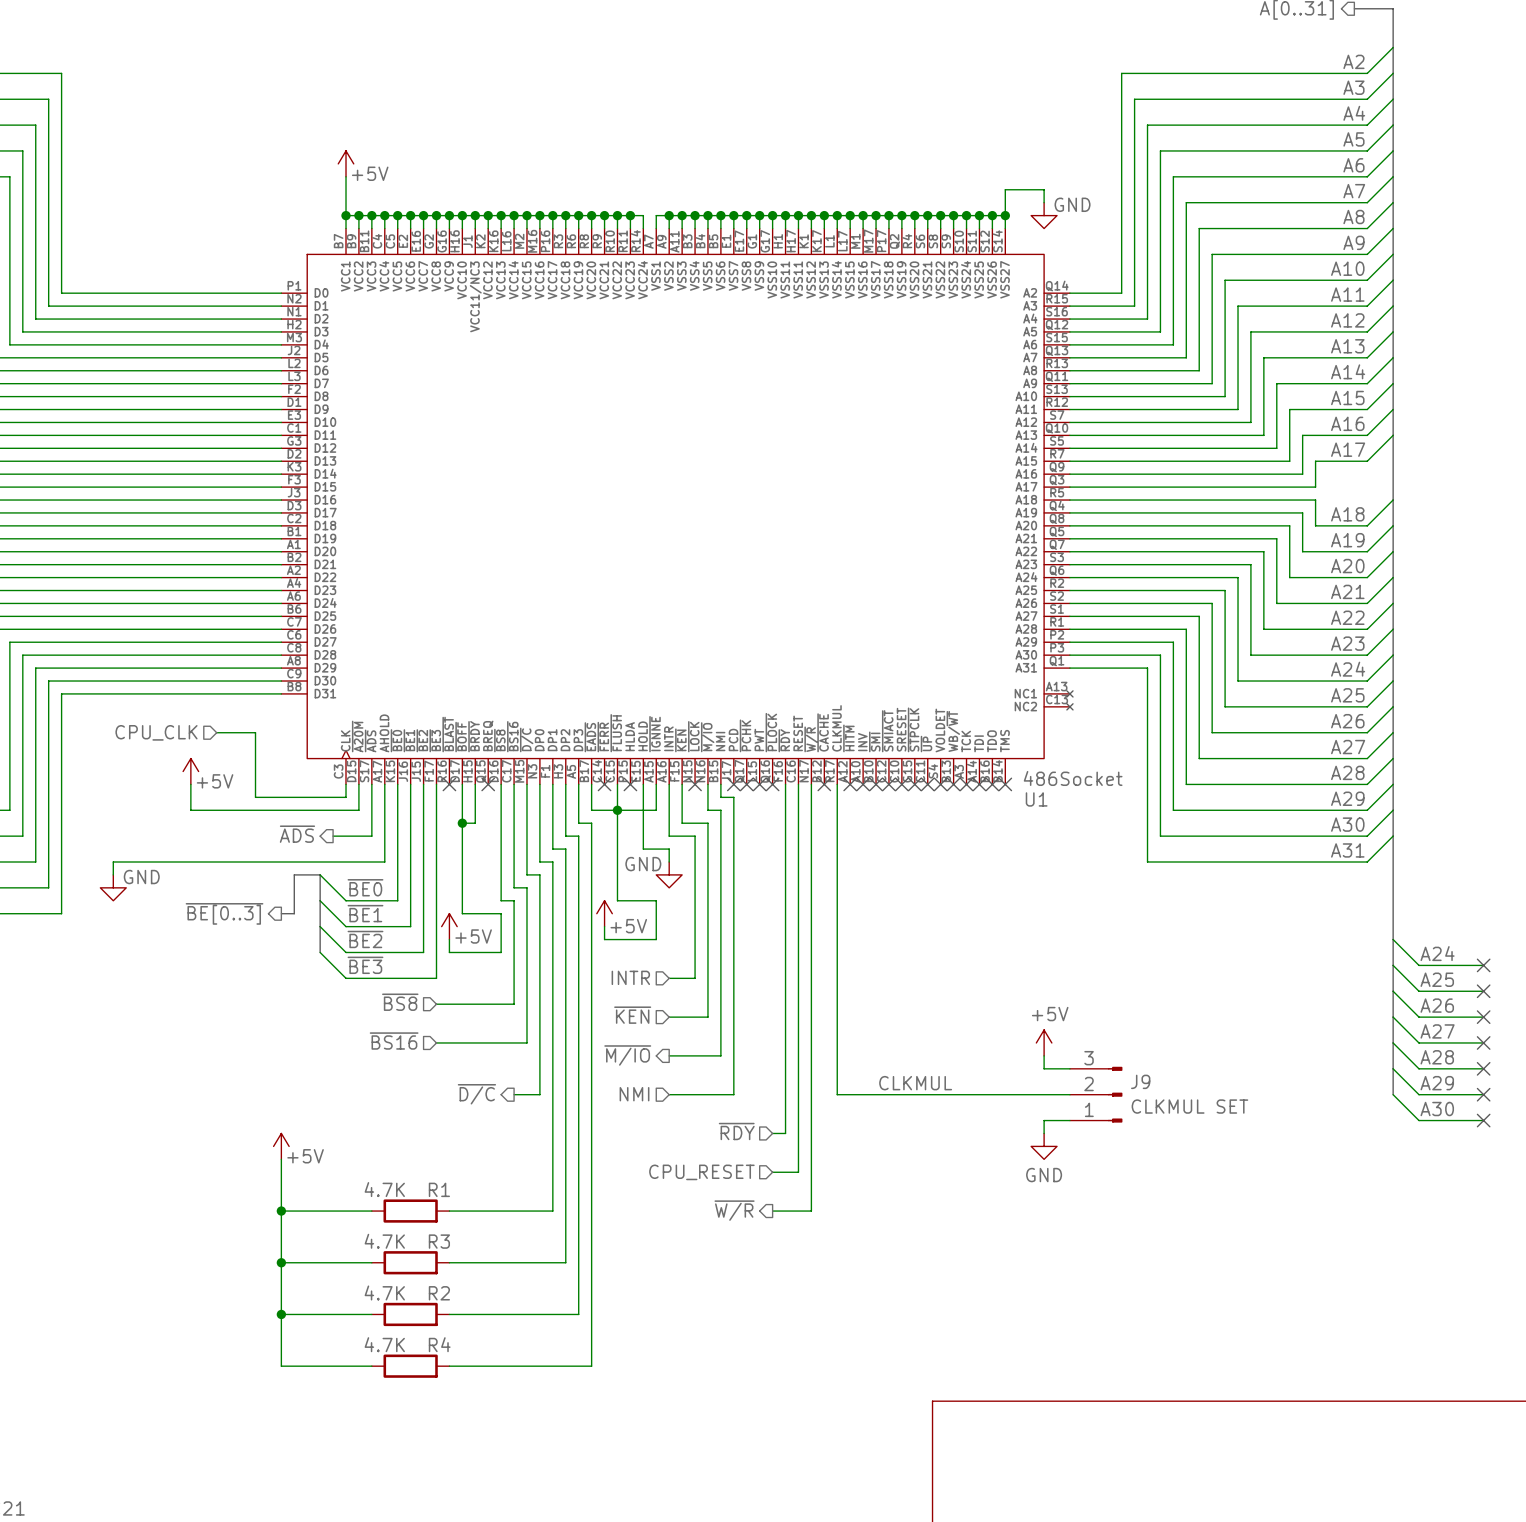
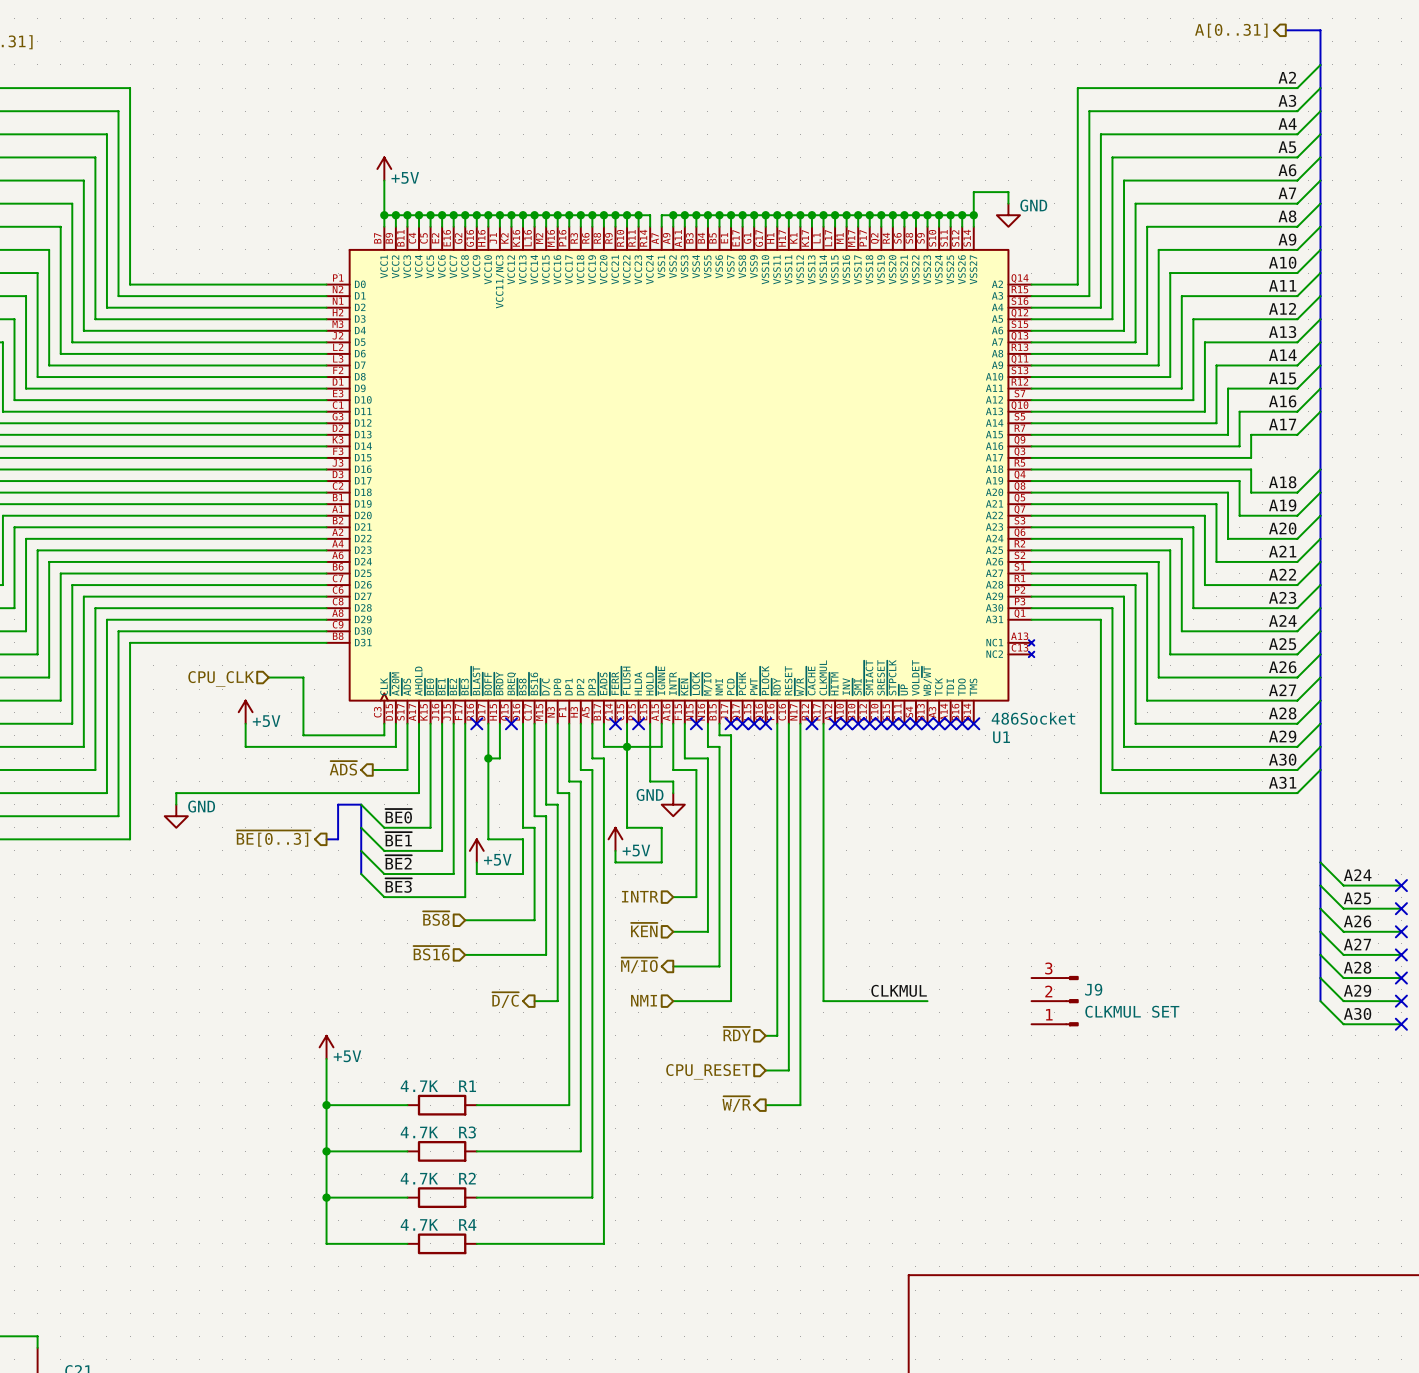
power symbol: +5V (1044, 1042) -> none
wire: (1044, 1055) (1044, 1068) (1069, 1068) -> none
wire: (953, 1094) (1069, 1094) -> none
wire: (1069, 1120) (1044, 1120) (1044, 1133) -> none
power symbol: GND (1044, 1146) -> none

